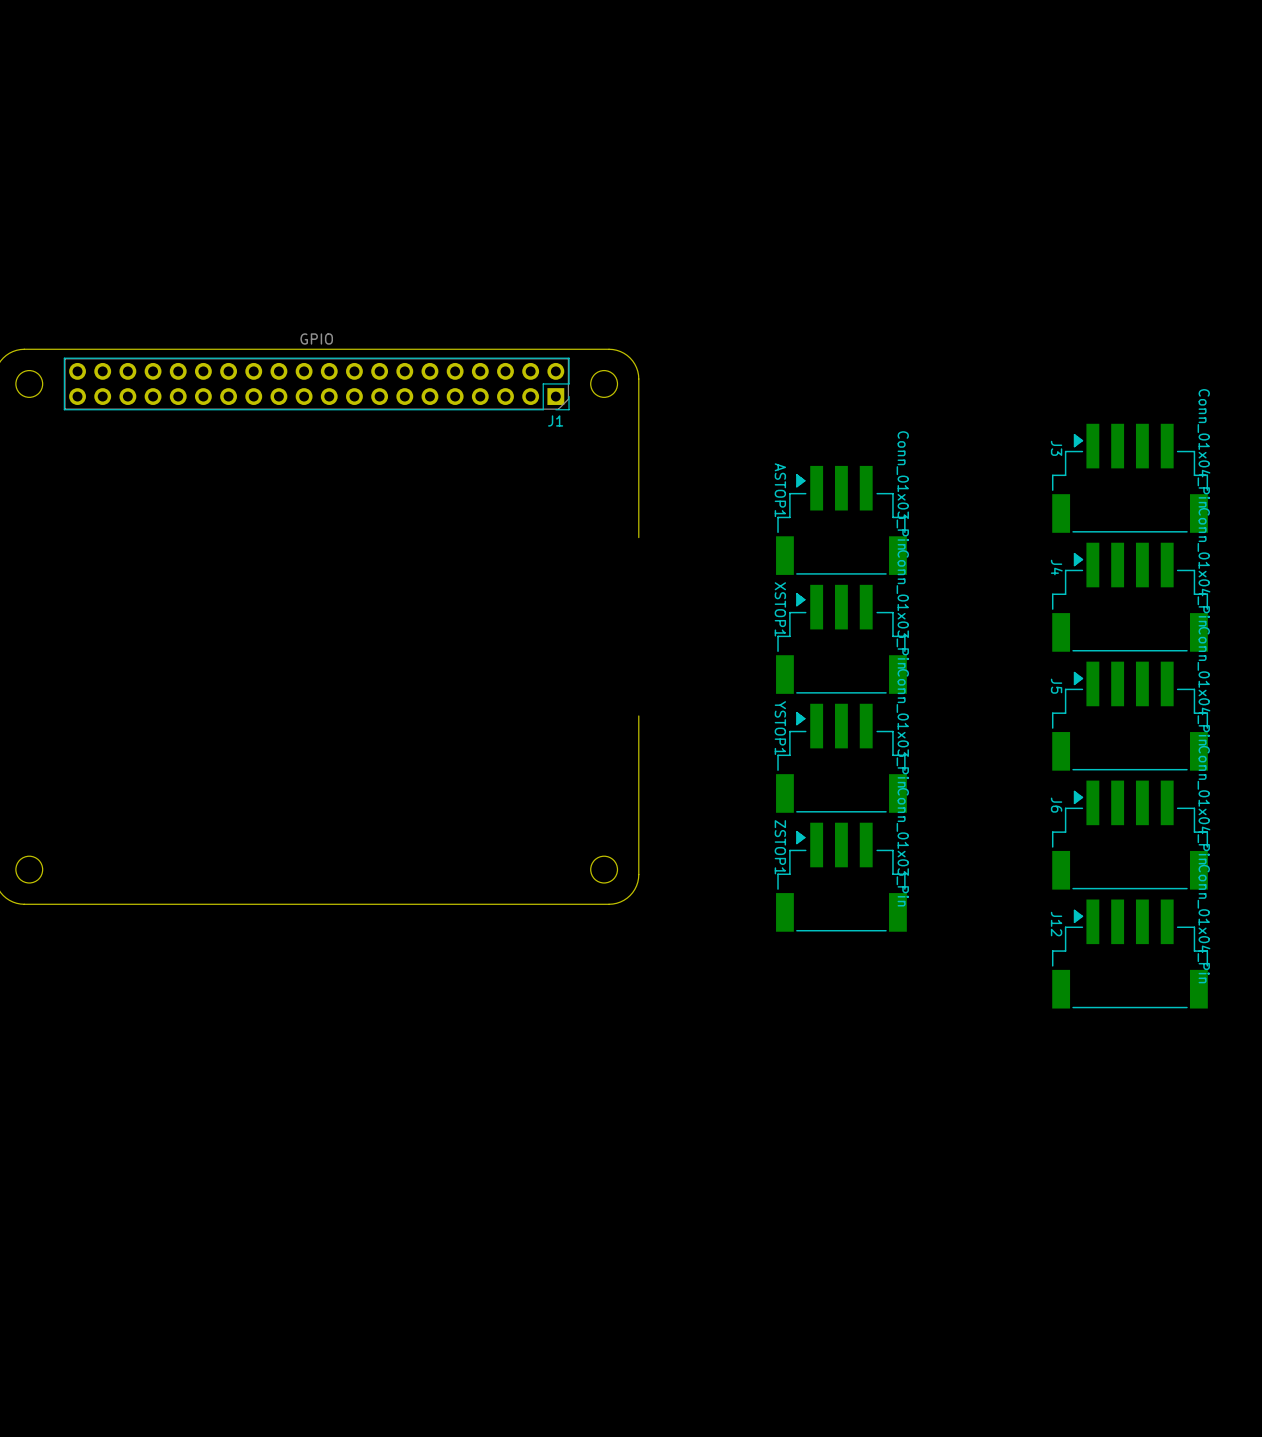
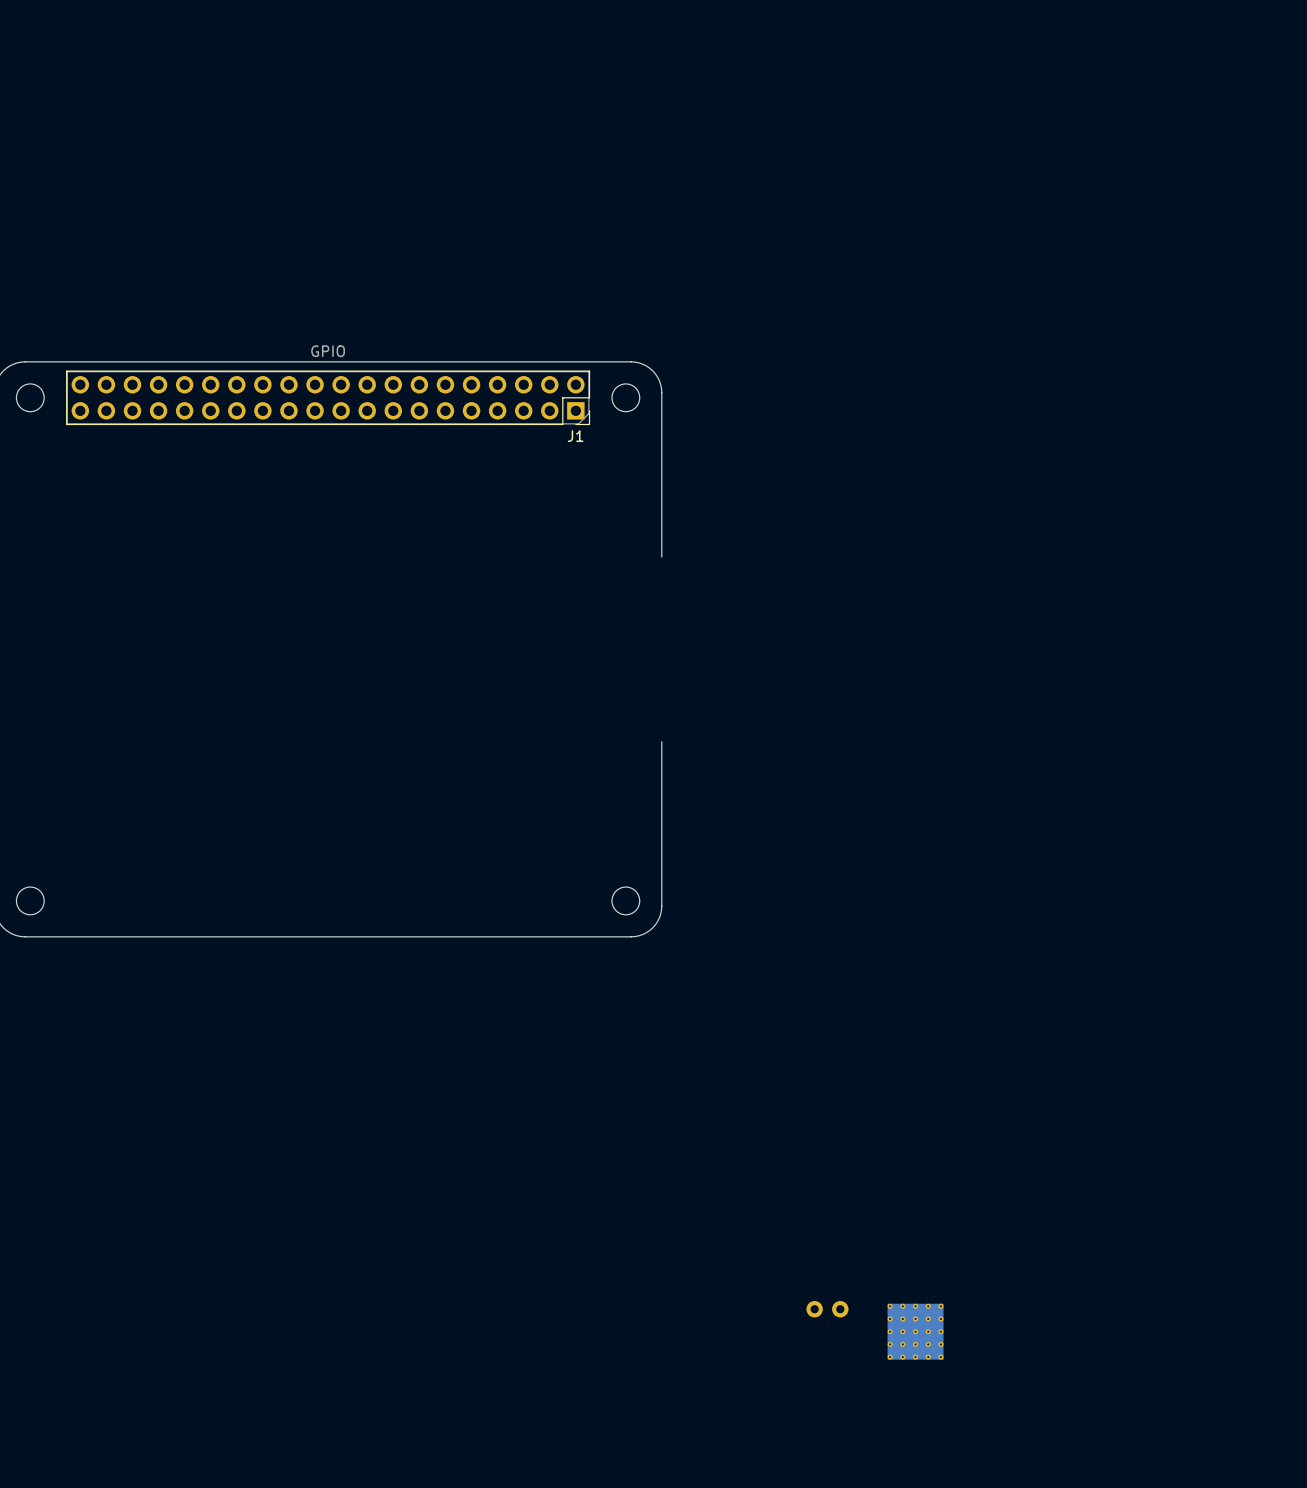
J3: Conn_01x04_Pin (1130, 478) -> none
ASTOP1: Conn_01x03_Pin (841, 520) -> none
J4: Conn_01x04_Pin (1130, 597) -> none
XSTOP1: Conn_01x03_Pin (841, 639) -> none
J5: Conn_01x04_Pin (1130, 716) -> none
YSTOP1: Conn_01x03_Pin (841, 758) -> none
J6: Conn_01x04_Pin (1130, 835) -> none
ZSTOP1: Conn_01x03_Pin (841, 877) -> none
J12: Conn_01x04_Pin (1130, 954) -> none
part: none -> (827, 1309)
part: none -> (915, 1331)

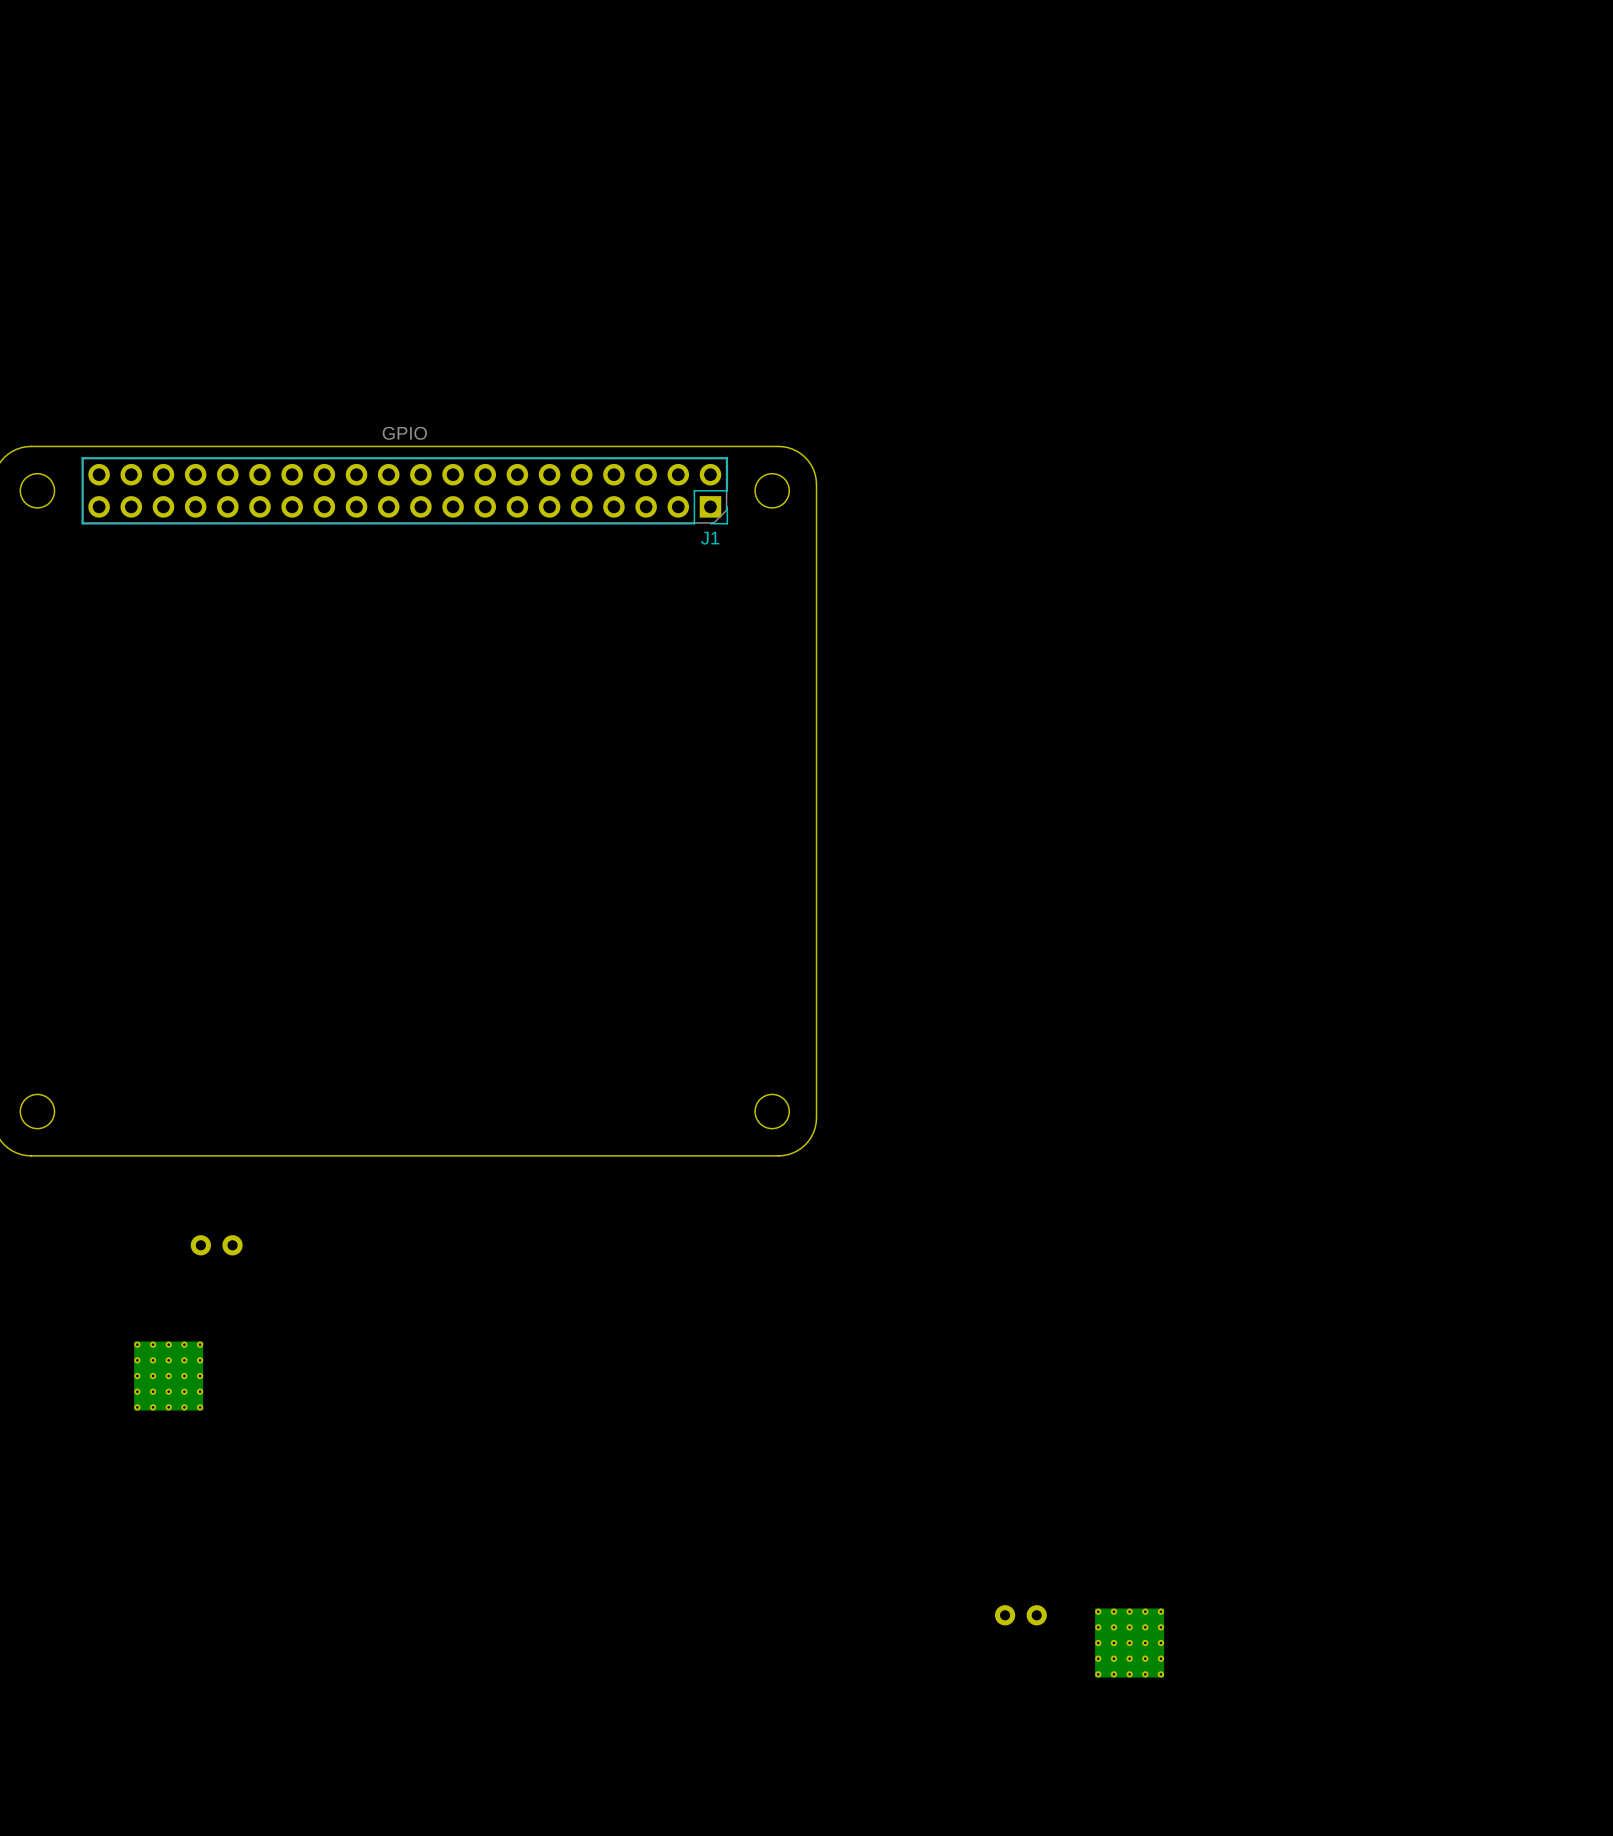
board edge: none -> (816, 687) (816, 915)
part: none -> (216, 1245)
part: none -> (168, 1376)

